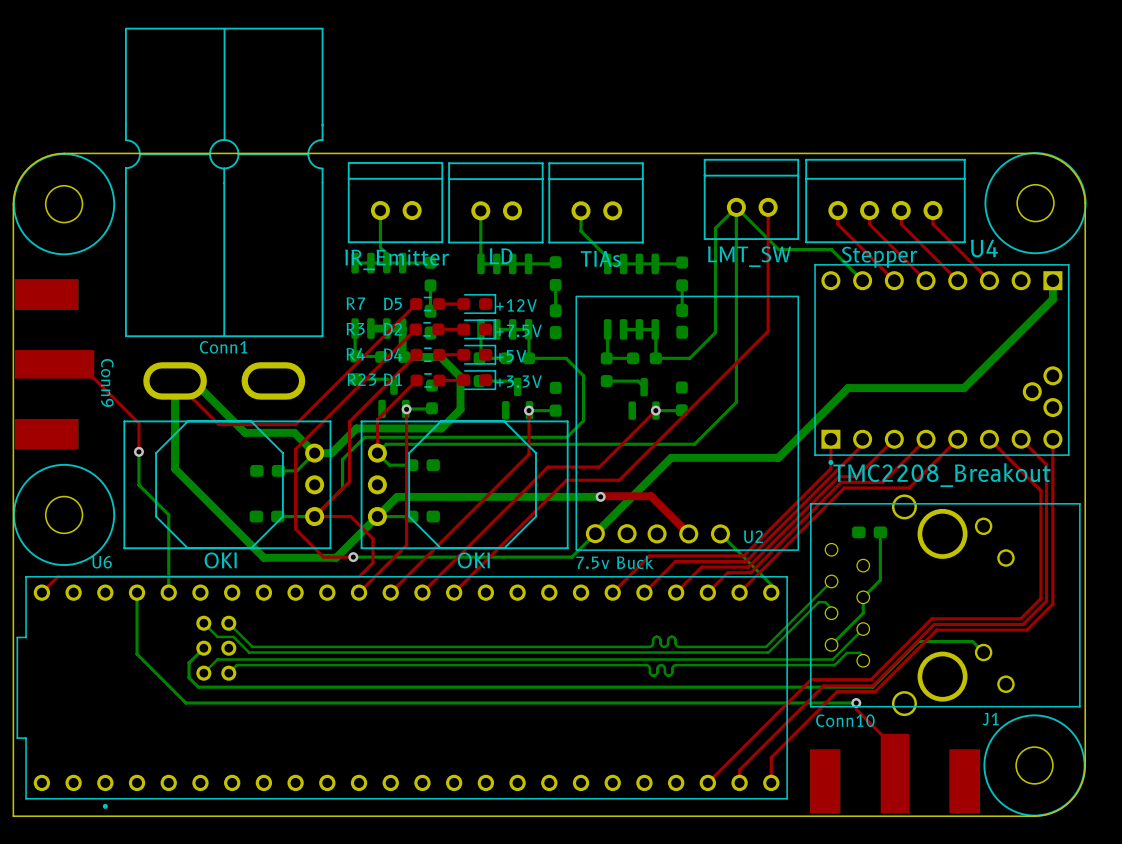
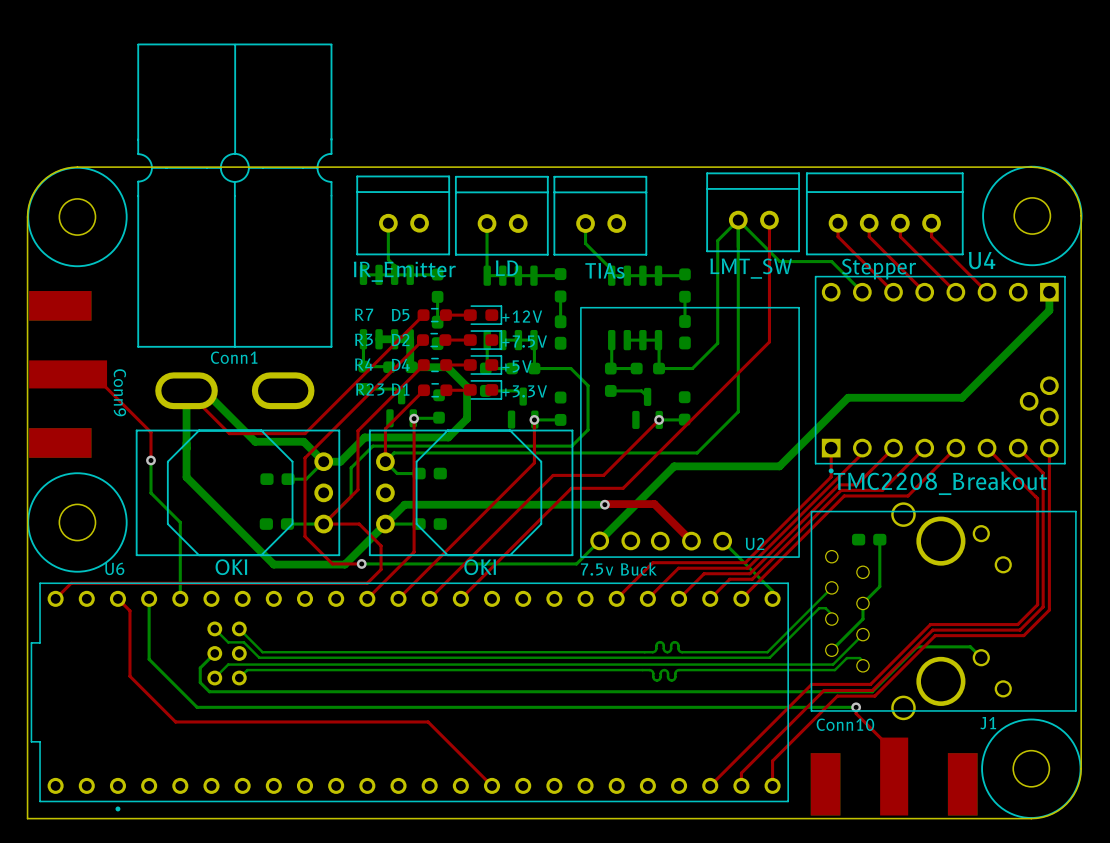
top track: none -> (117, 598) (129, 610) (129, 676) (175, 721) (428, 721) (492, 785)

